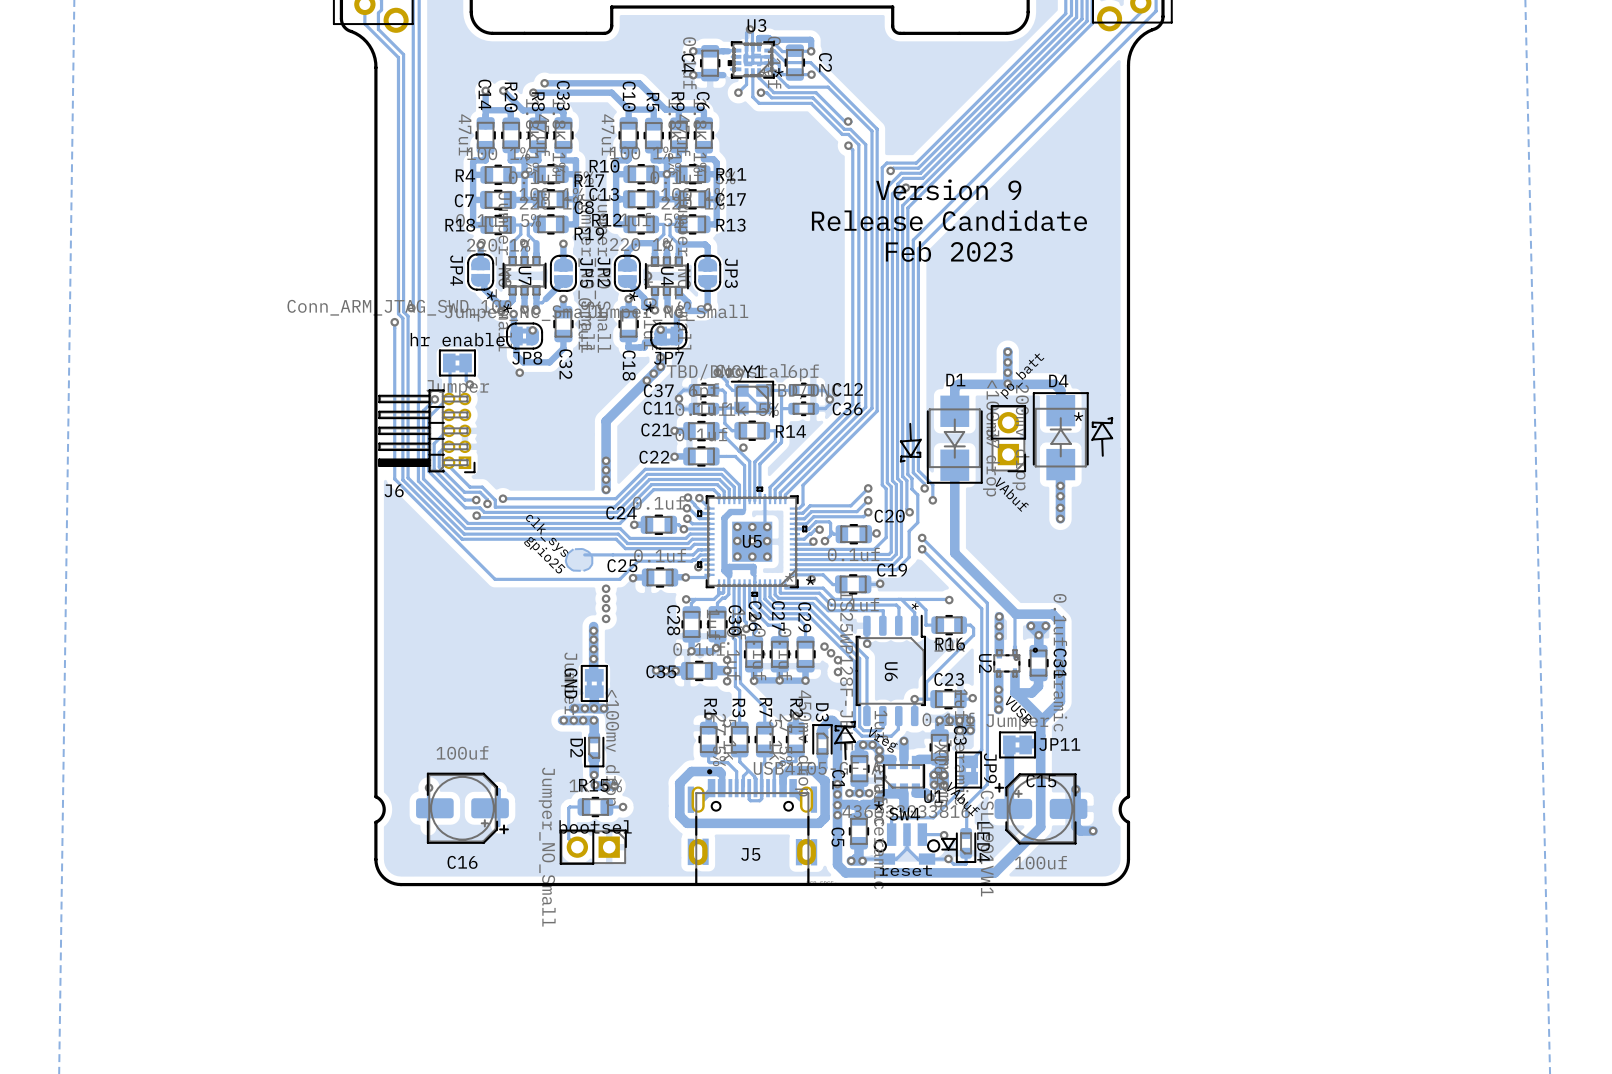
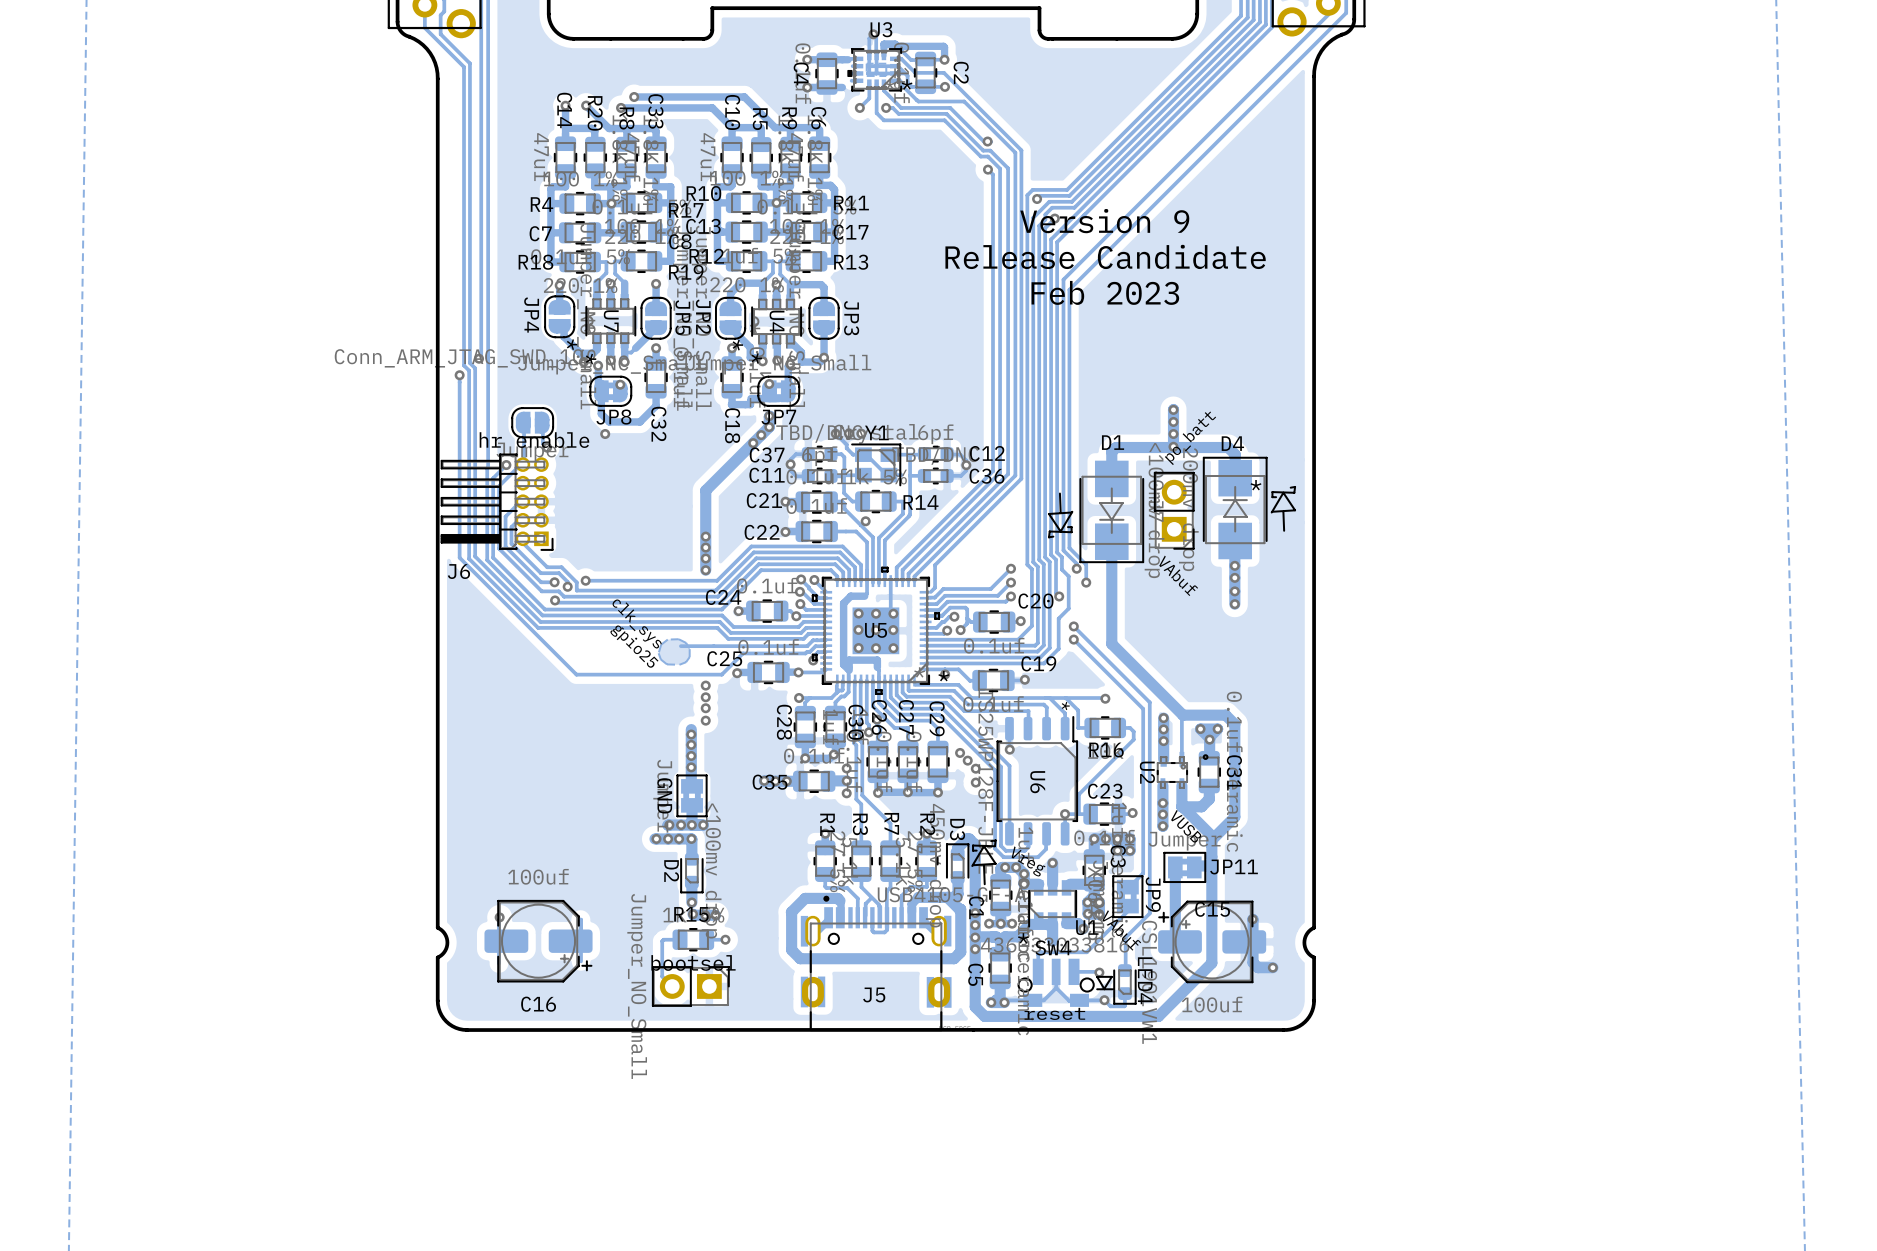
hr enable name position: hr enable (457, 339) -> hr enable (534, 440)
hr enable footprint: [439, 349, 476, 377] -> [511, 407, 554, 439]

